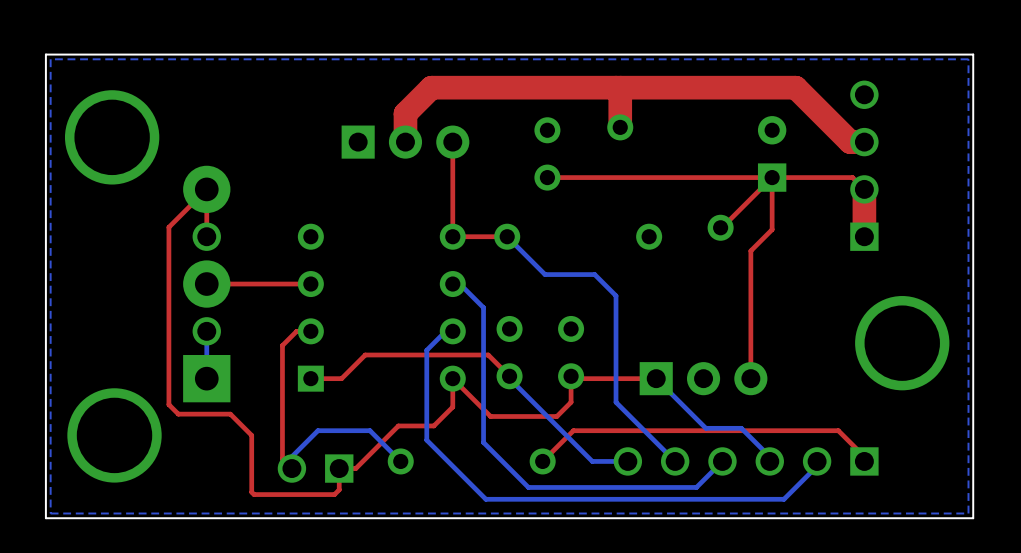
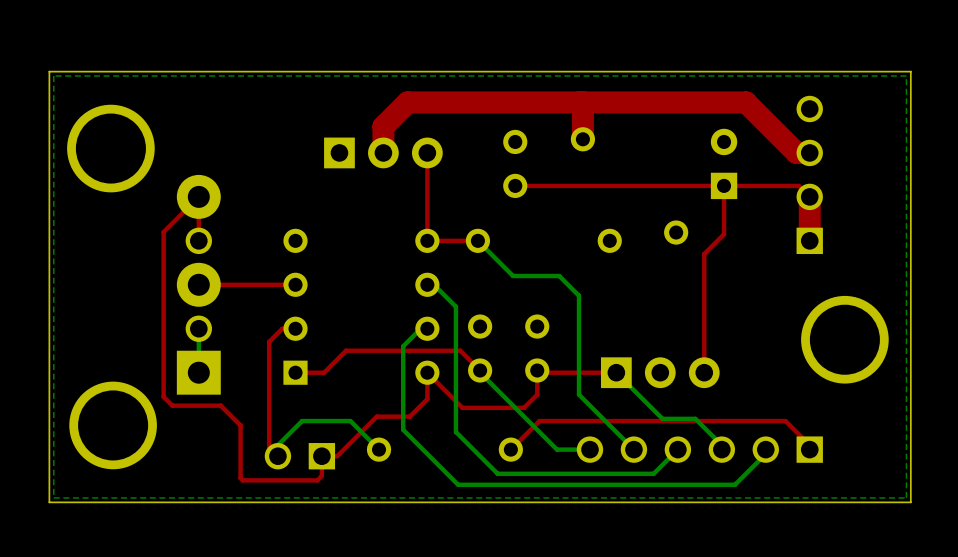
top track: (772, 177) (720, 227) -> none

